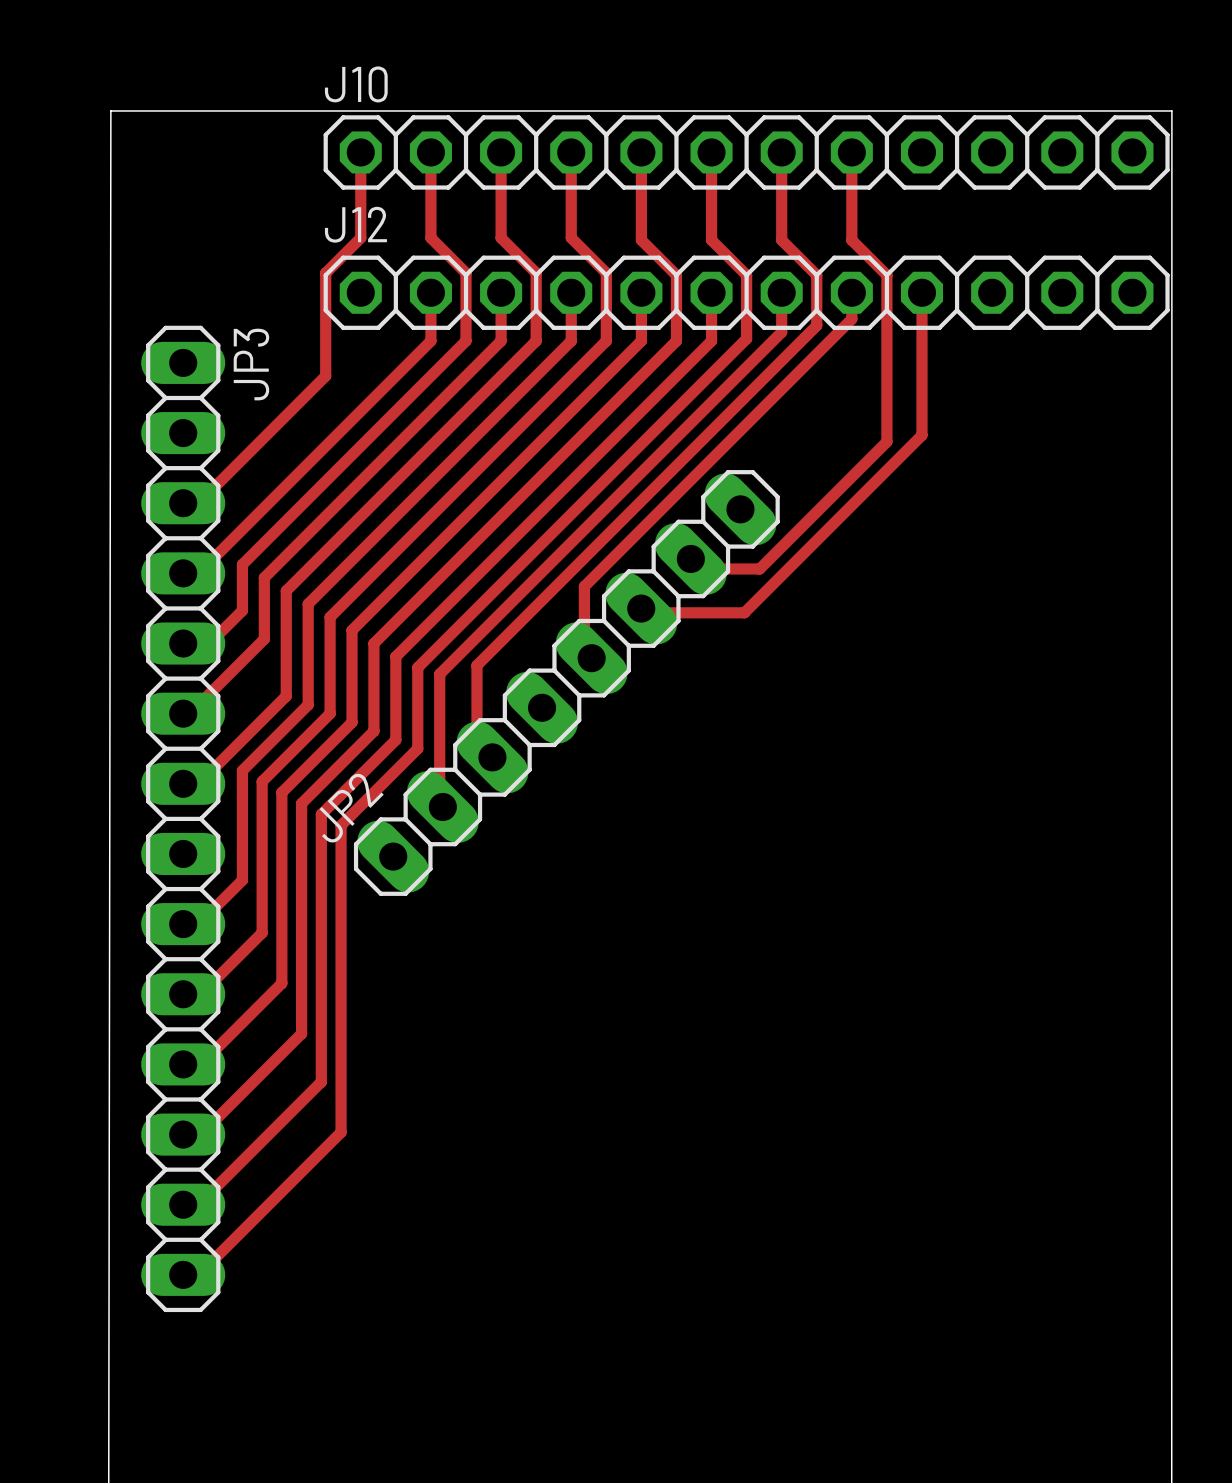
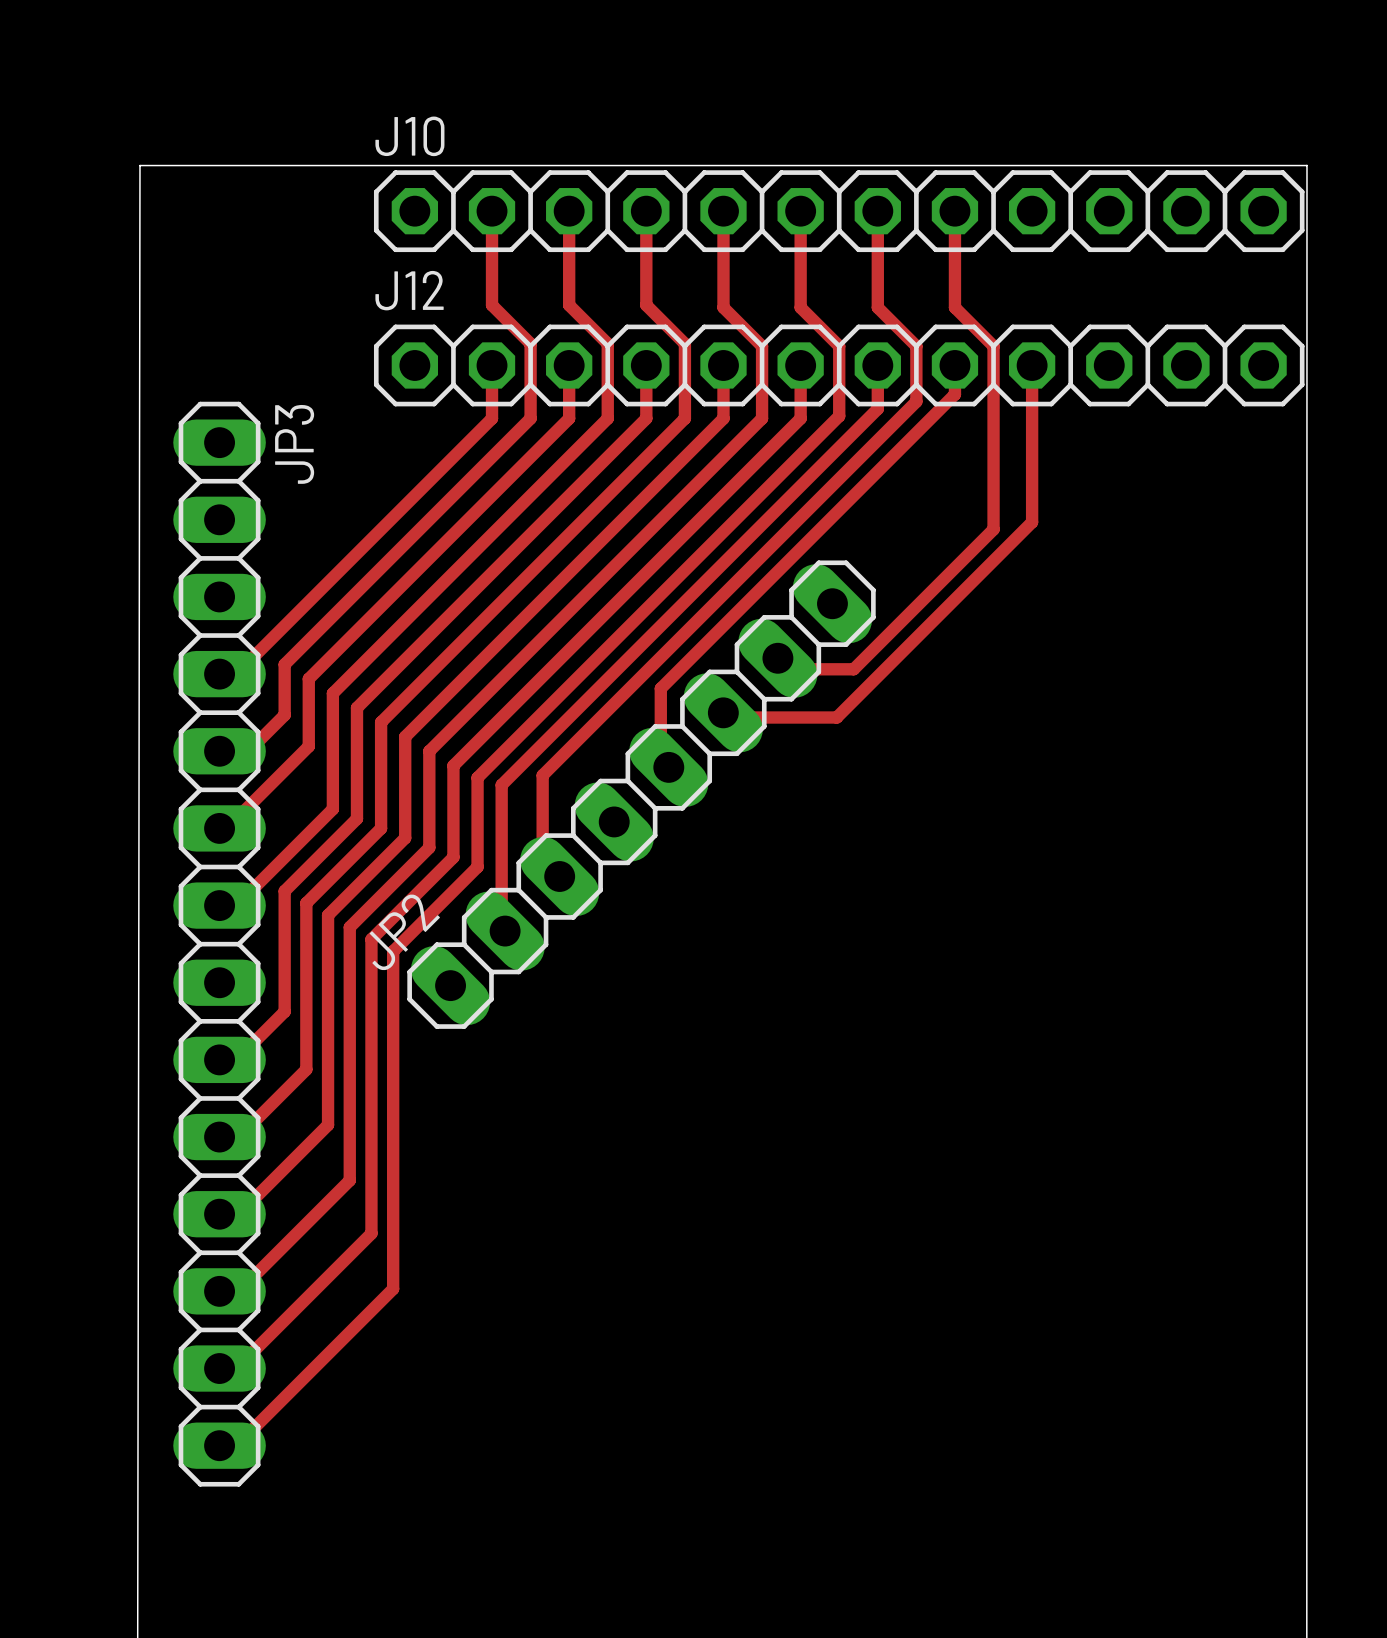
track: (360, 152) (360, 237) (325, 273) (325, 376) (200, 501) (185, 501) (183, 503) -> none

